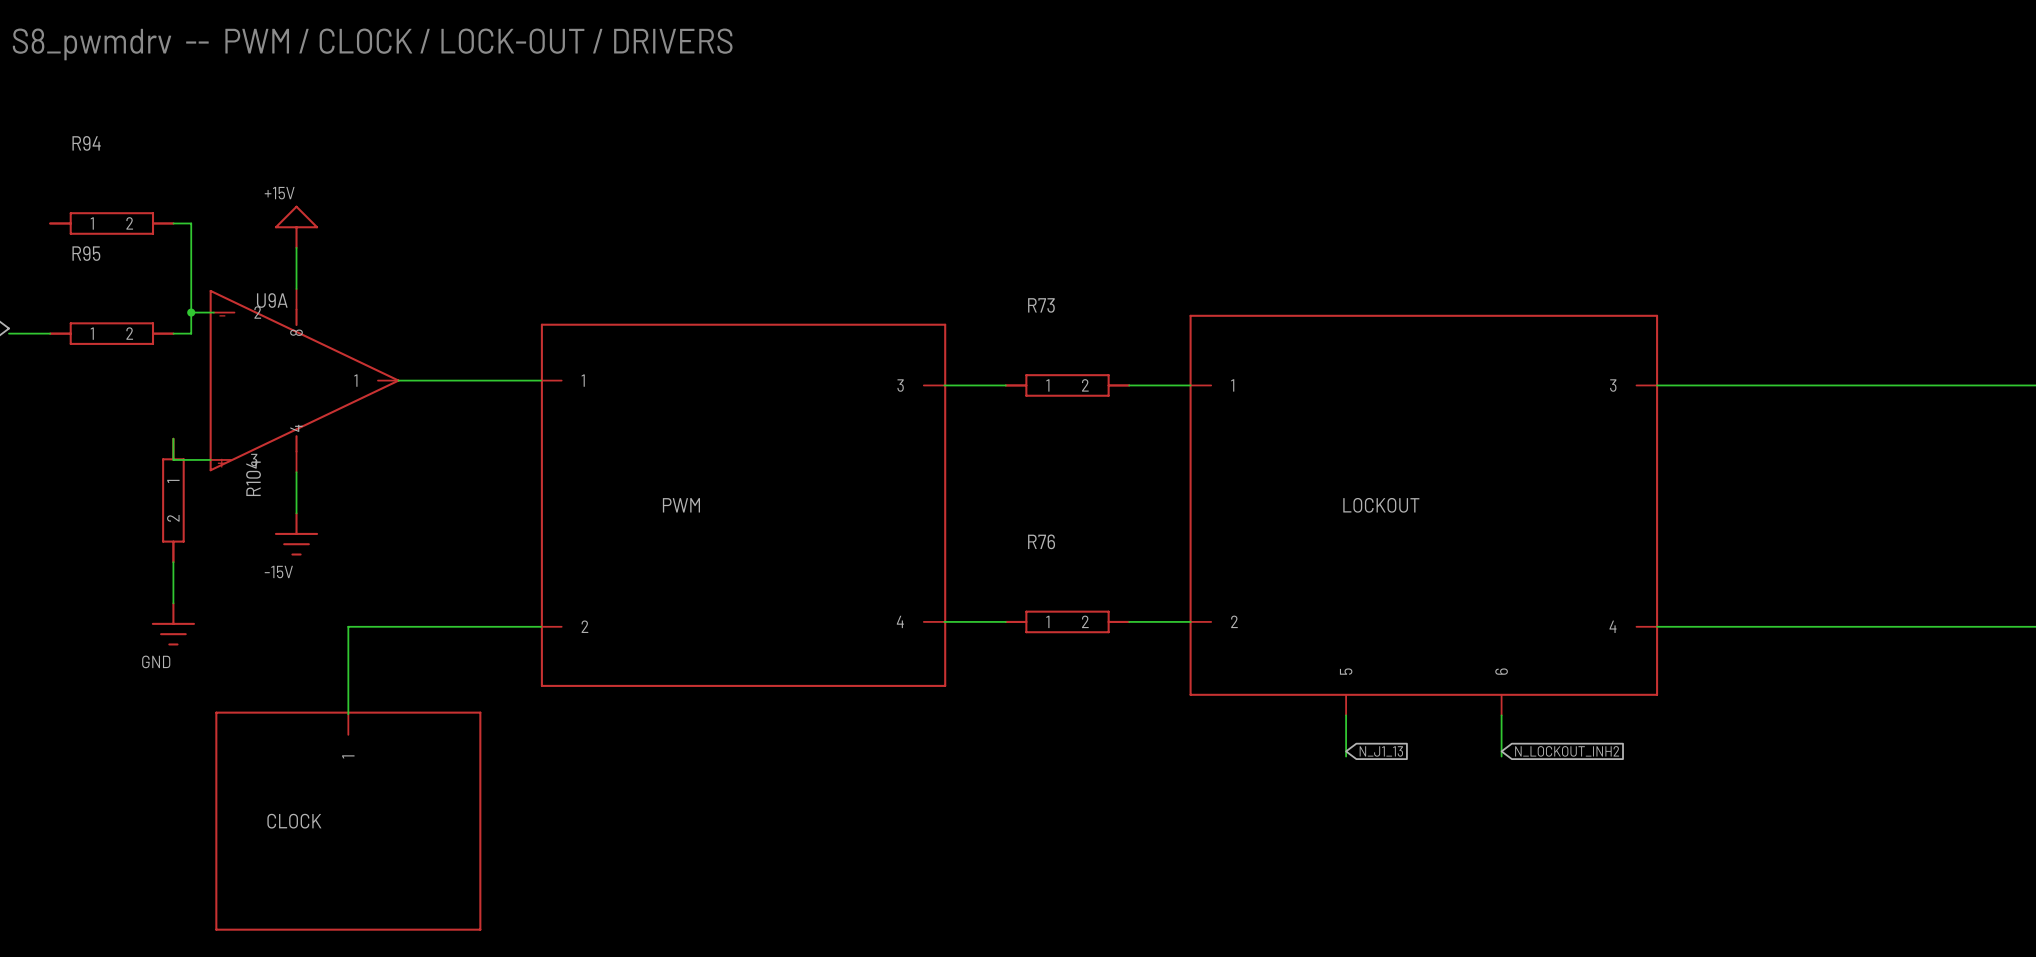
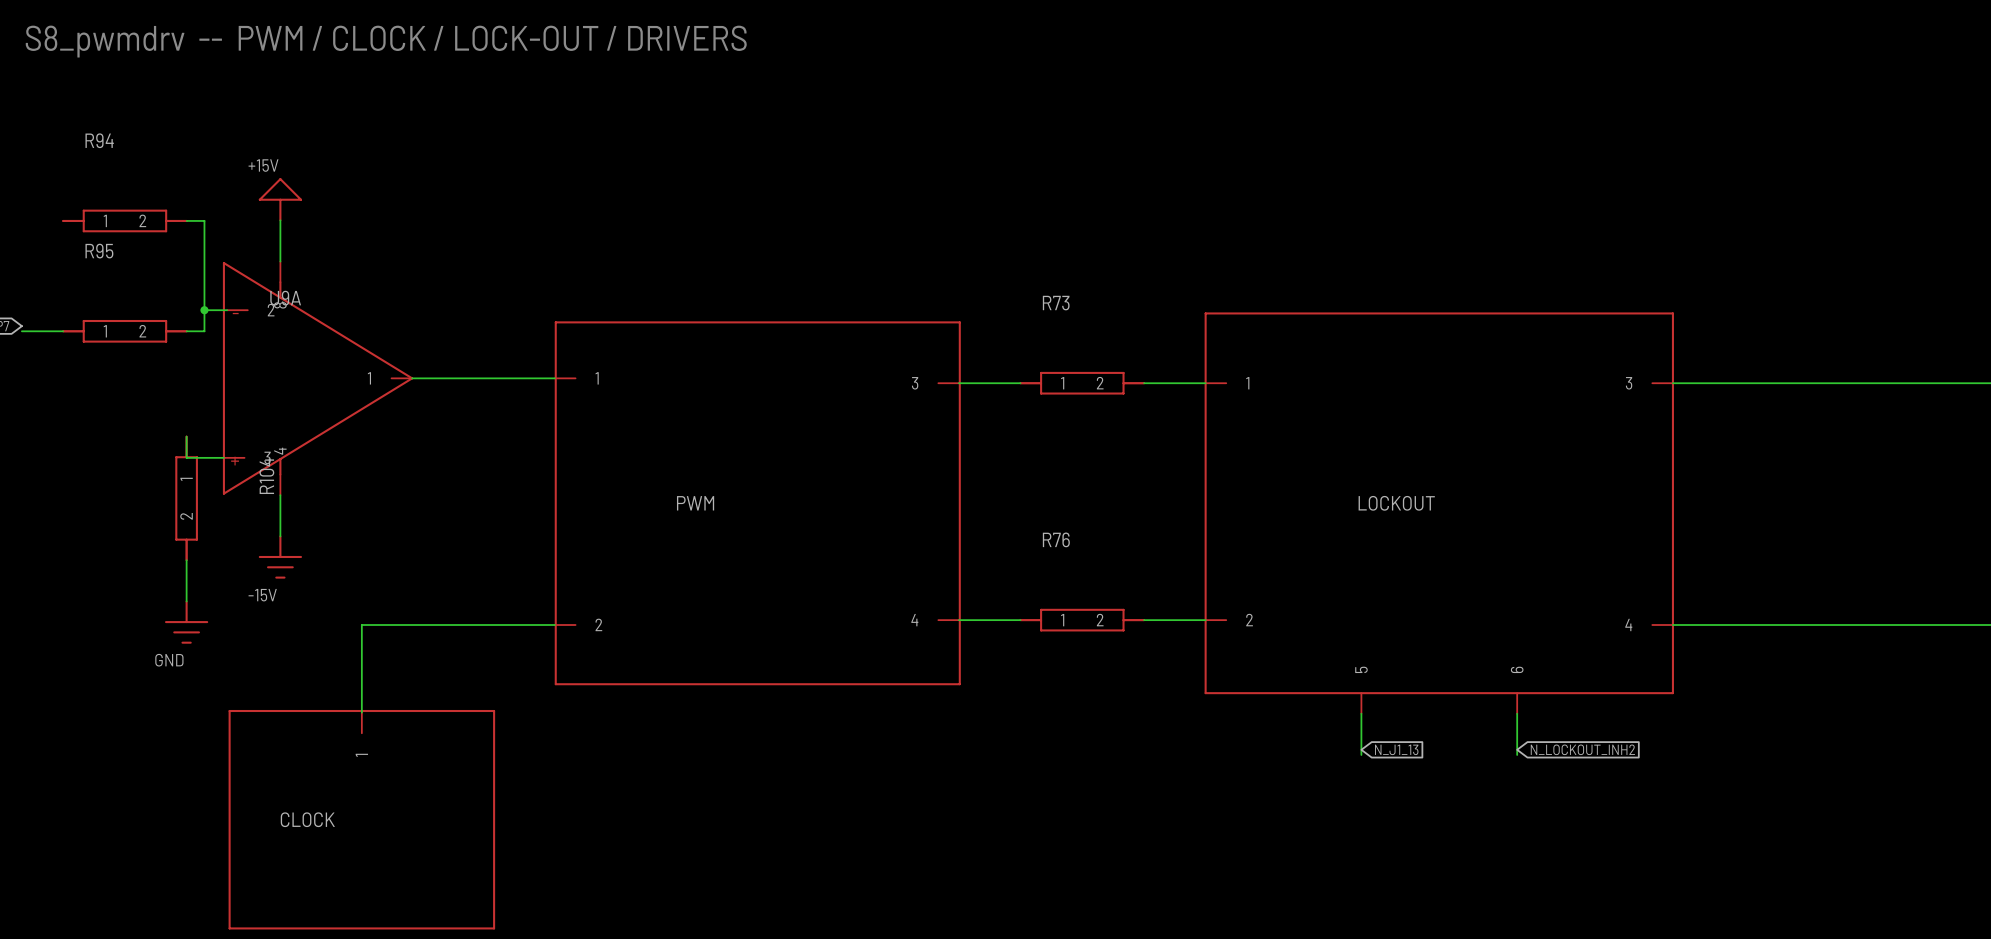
power symbol position: (296, 227) -> (280, 199)
wire: (296, 247) (296, 288) -> (280, 220) (280, 261)
U9A symbol: [209, 288, 400, 473] -> [222, 261, 414, 496]
wire: (296, 472) (296, 513) -> (280, 495) (280, 536)
power symbol position: (296, 533) -> (280, 556)

